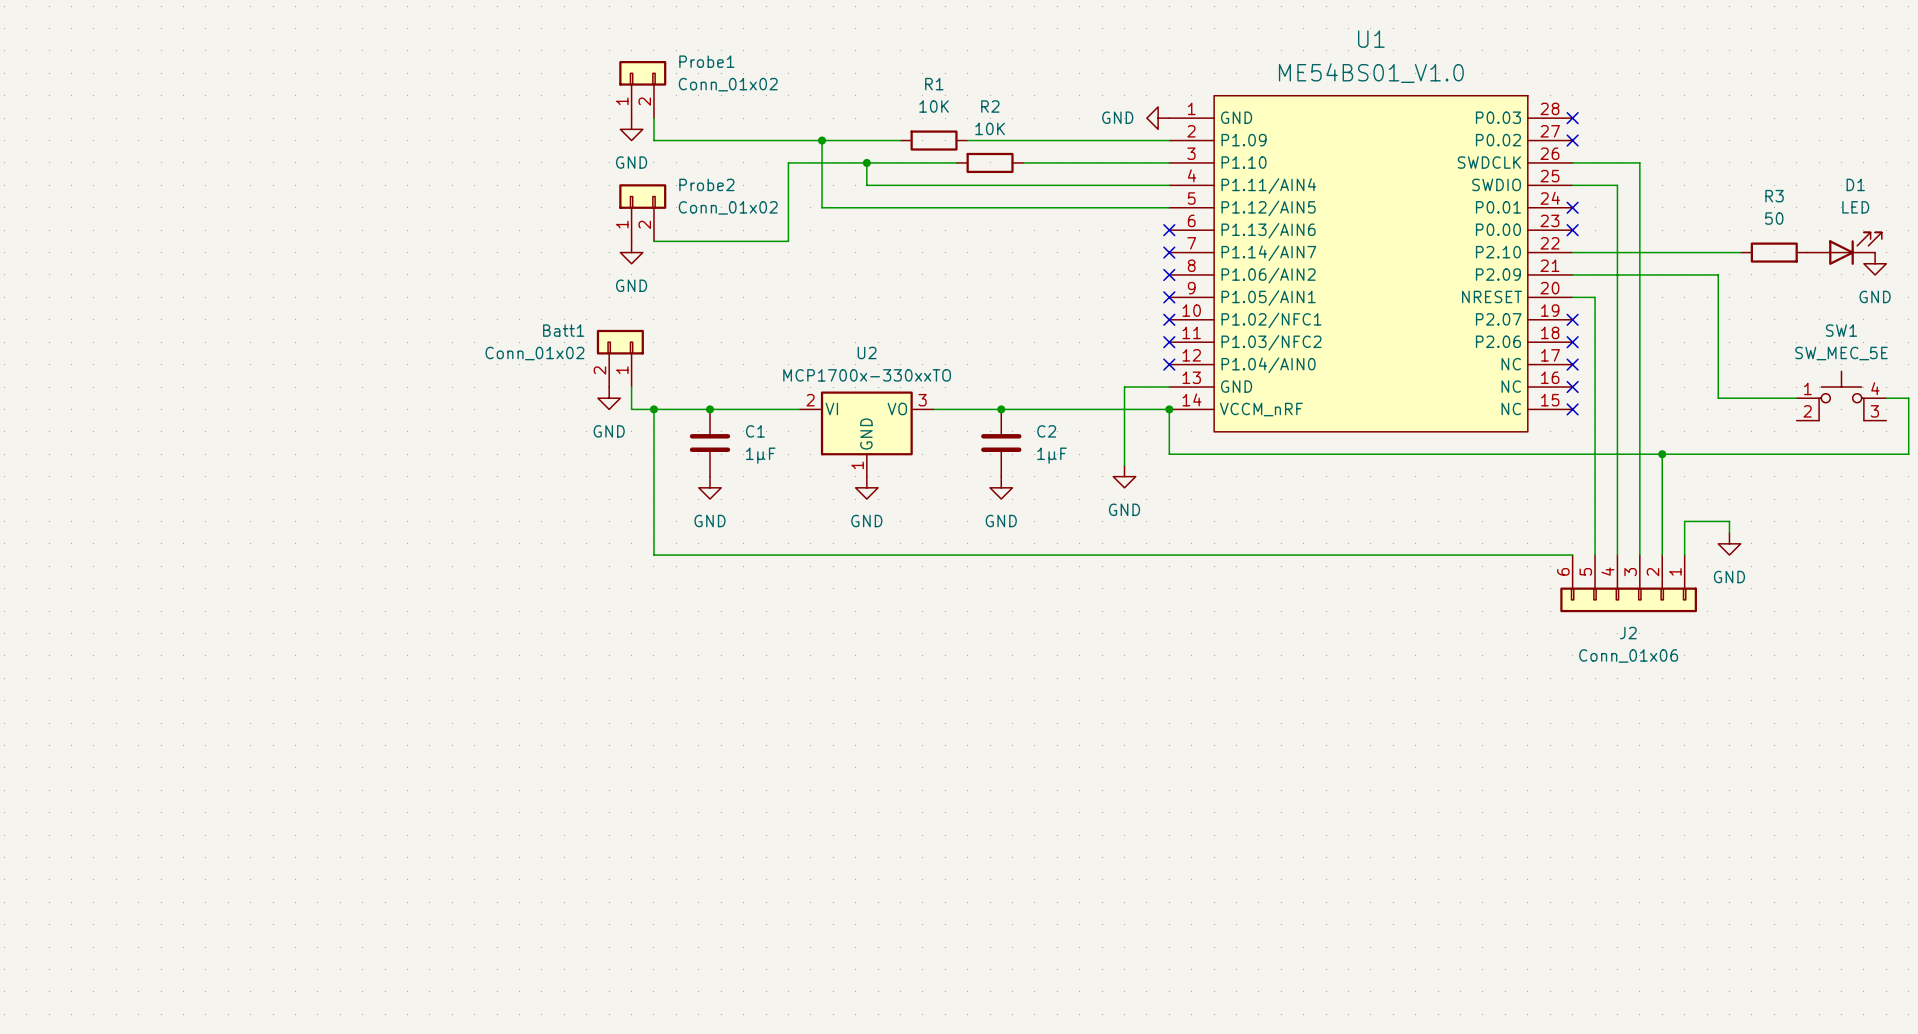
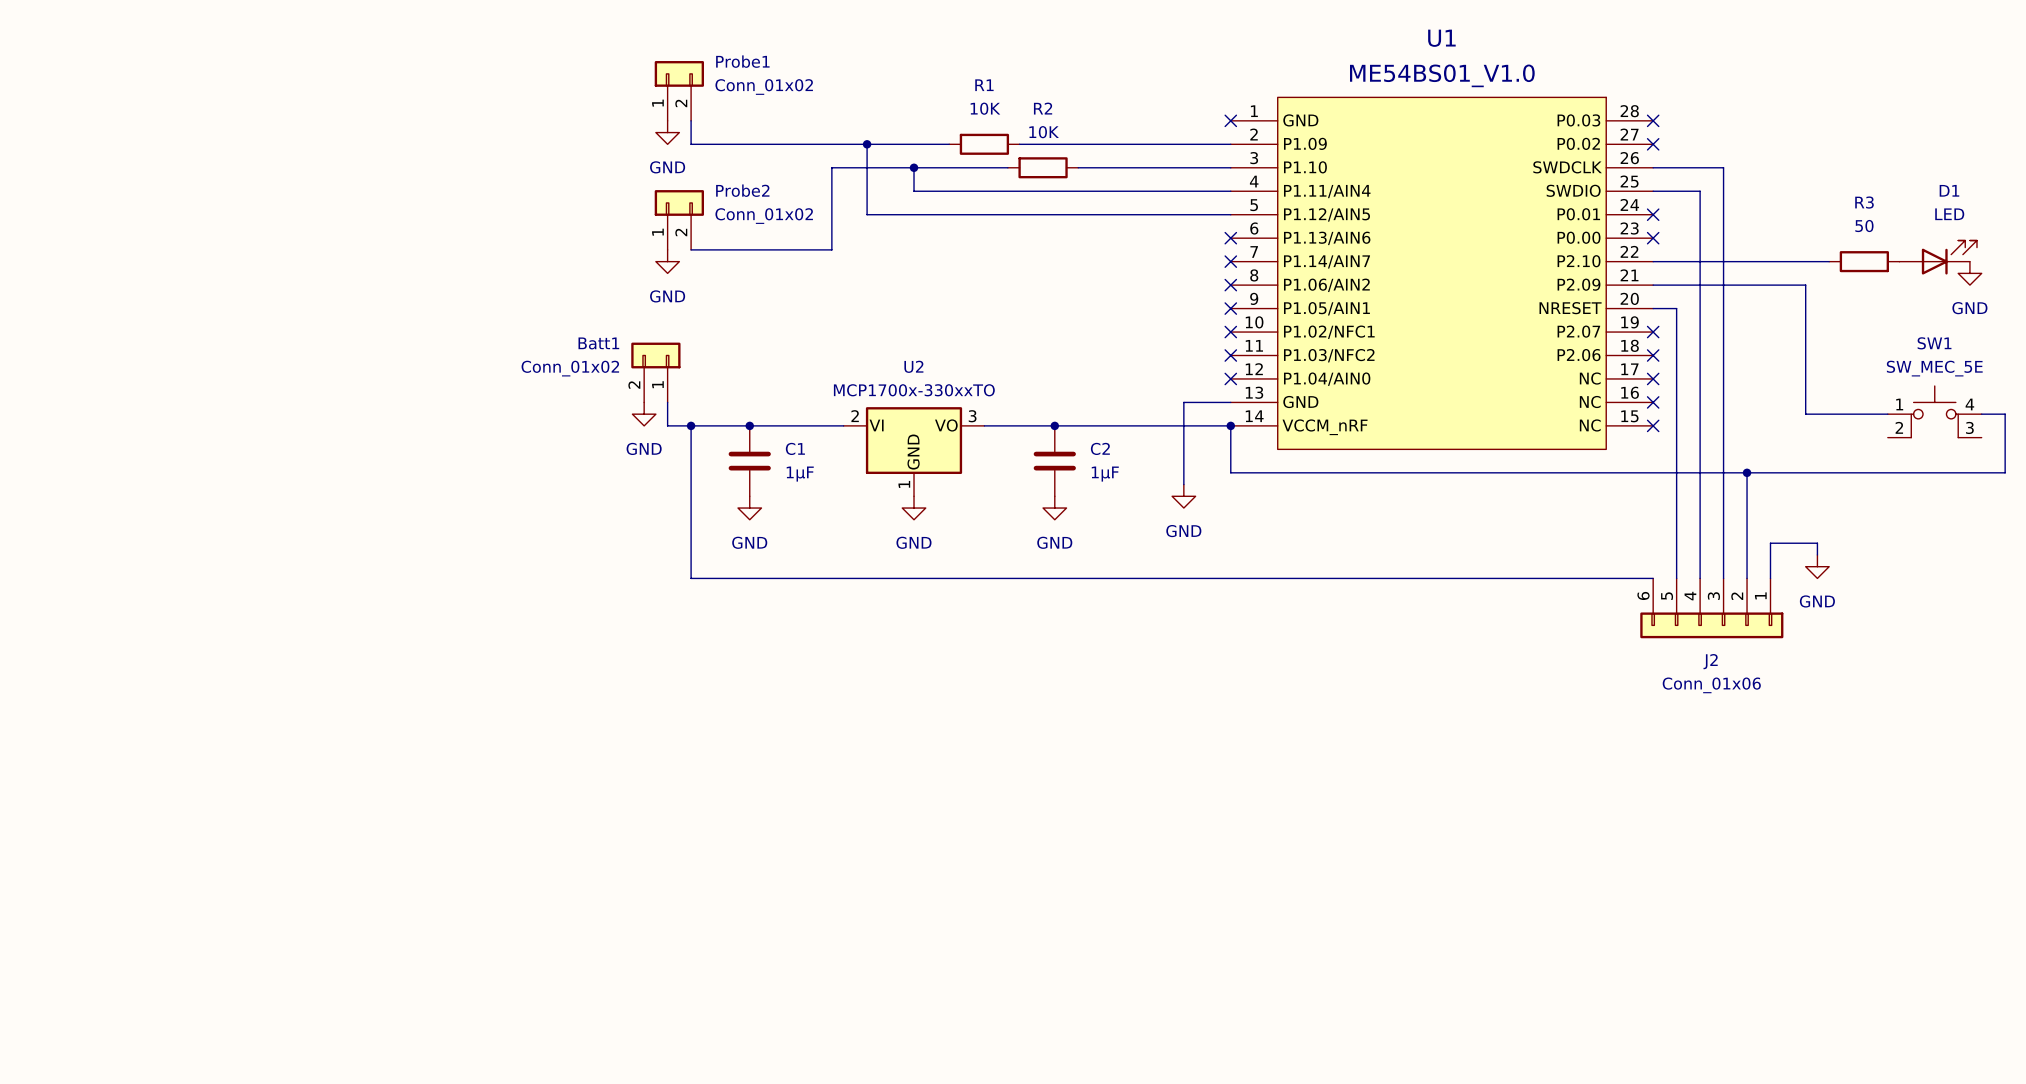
power symbol: GND (1158, 118) -> none
no-connect mark: none -> (1230, 120)

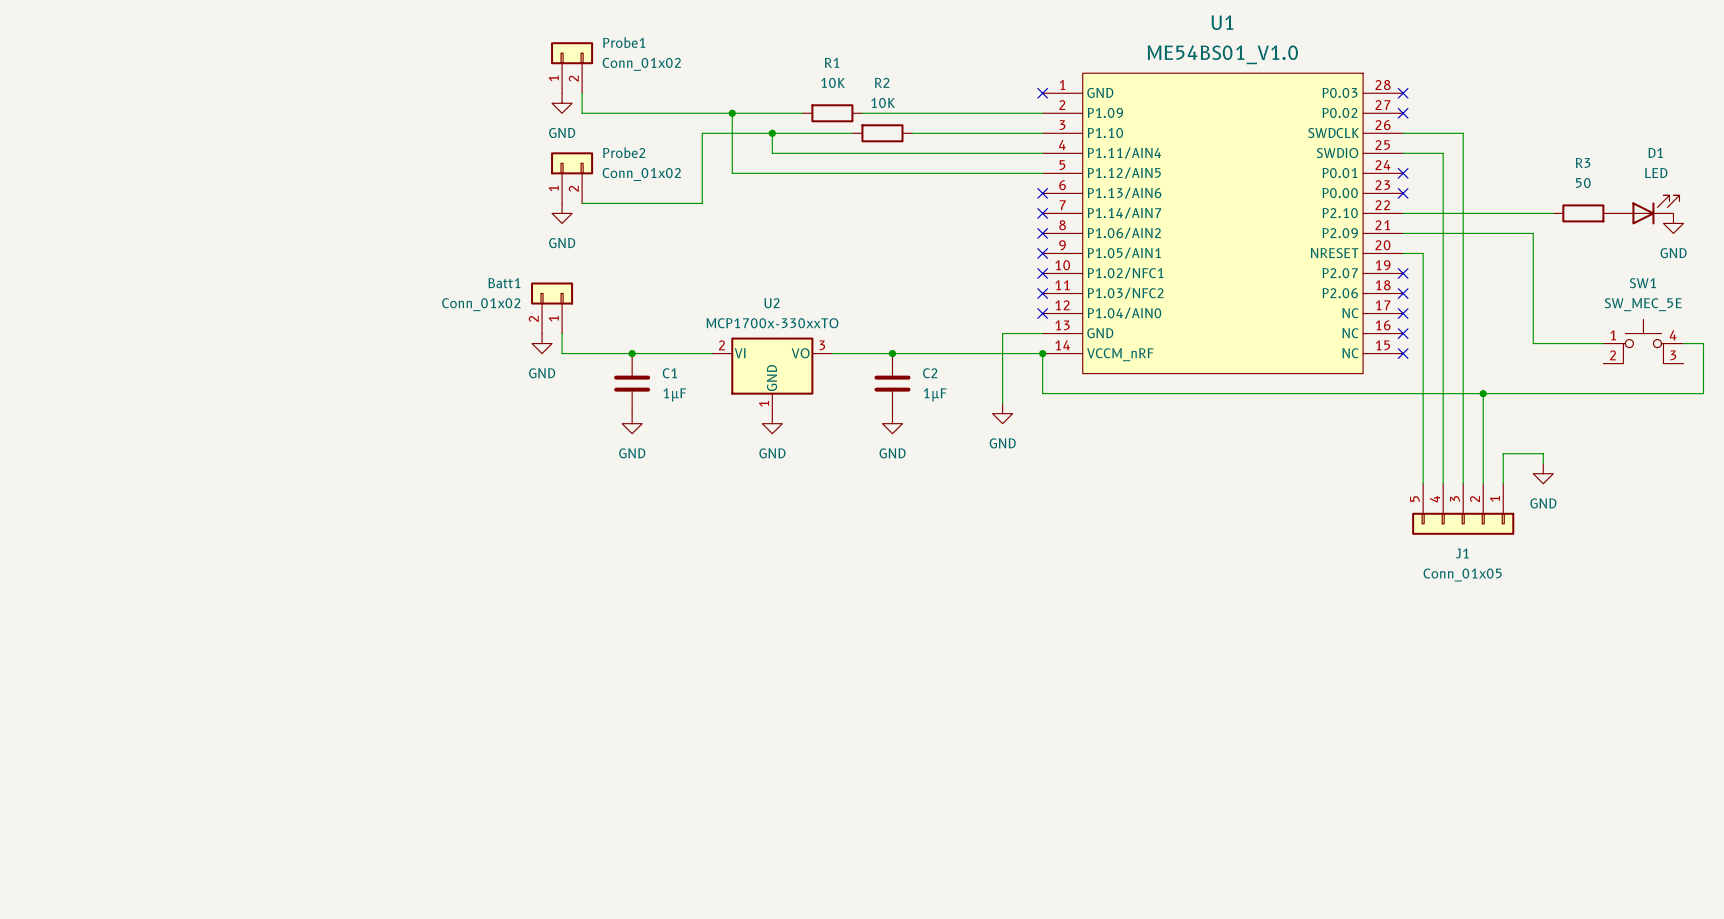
wire: (691, 425) (691, 578) (1653, 578) -> none
junction: (691, 425) -> none
J2: Conn_01x06 (1711, 608) -> none
J1: none -> Conn_01x05 (1463, 509)

